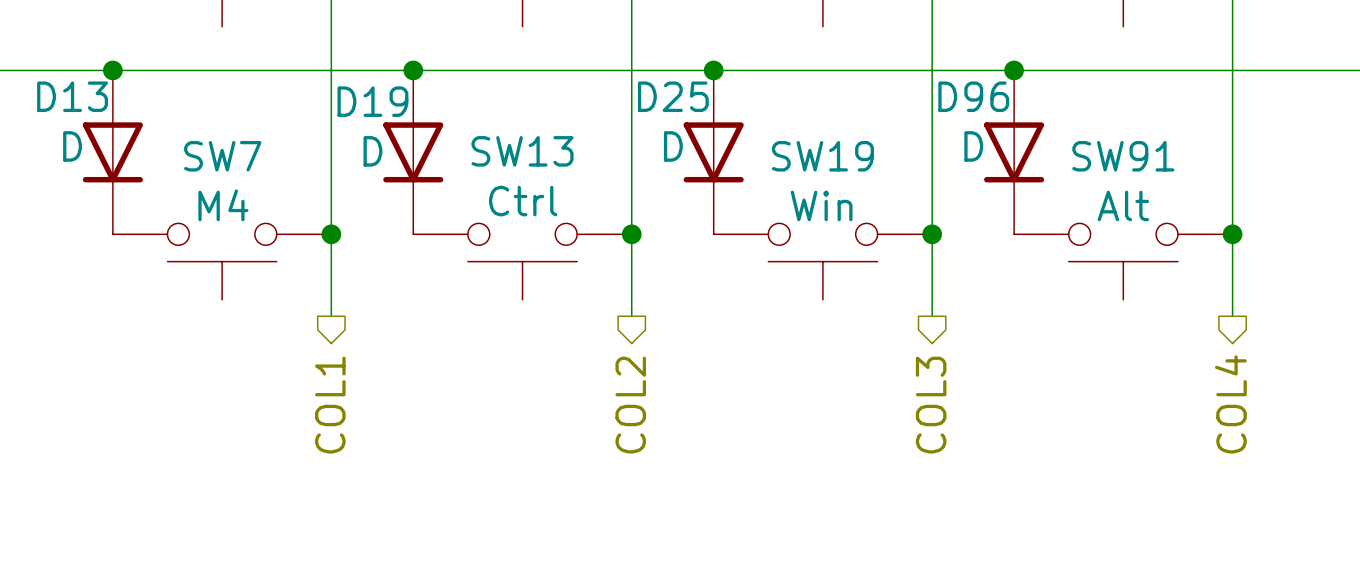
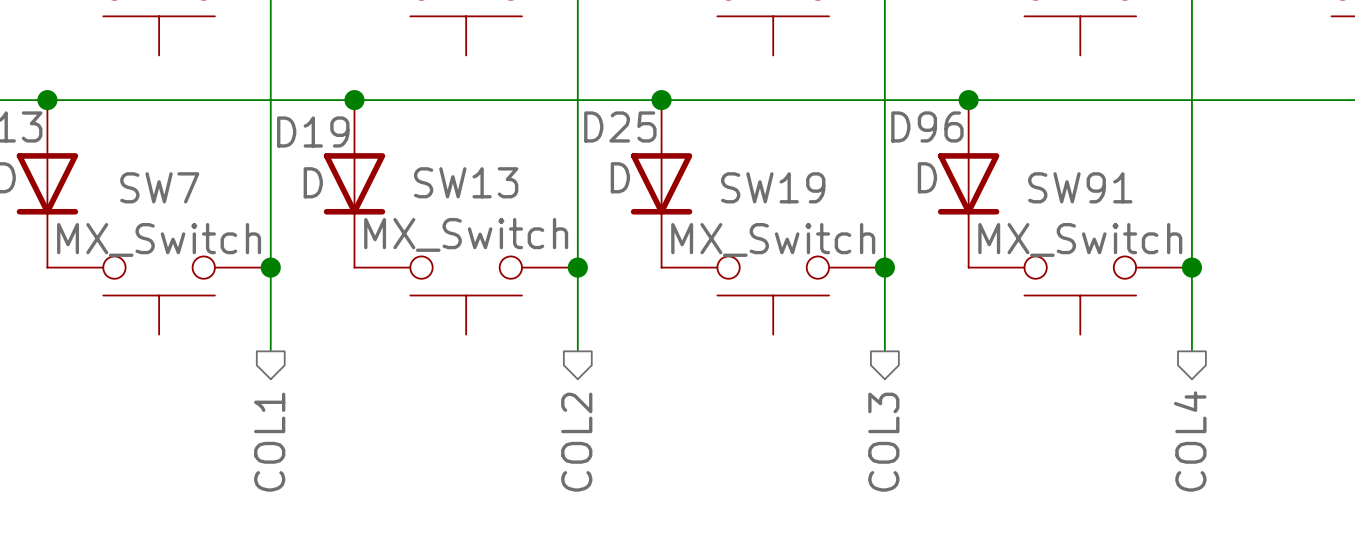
SW13 value: Ctrl (523, 201) -> MX_Switch (466, 234)
SW7 value: M4 (223, 205) -> MX_Switch (159, 239)
SW19 value: Win (821, 205) -> MX_Switch (773, 239)
SW91 value: Alt (1123, 205) -> MX_Switch (1080, 239)

